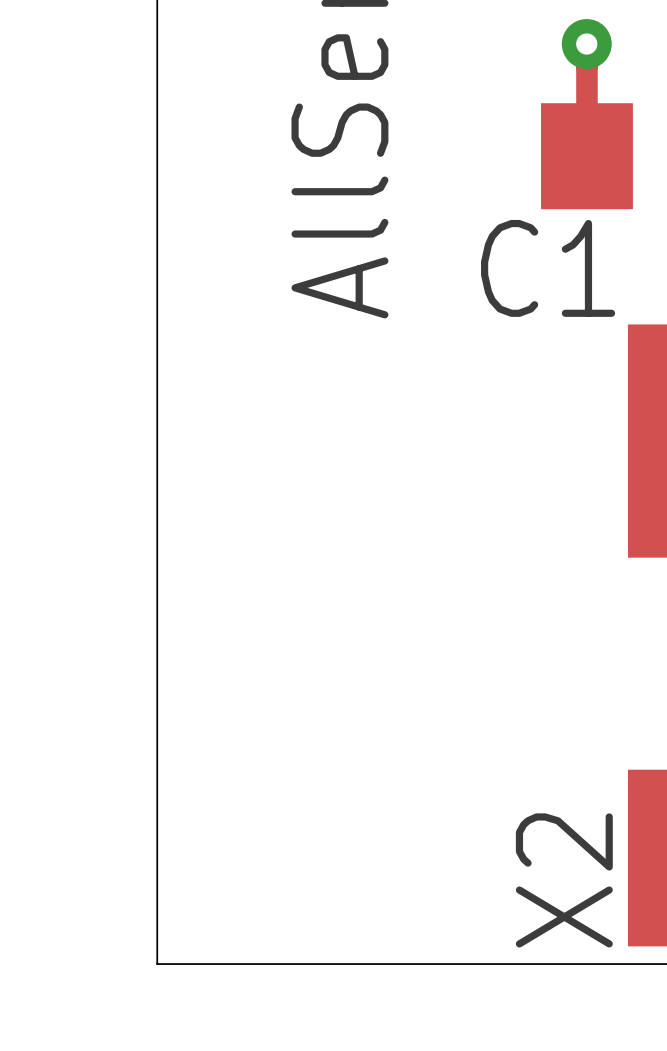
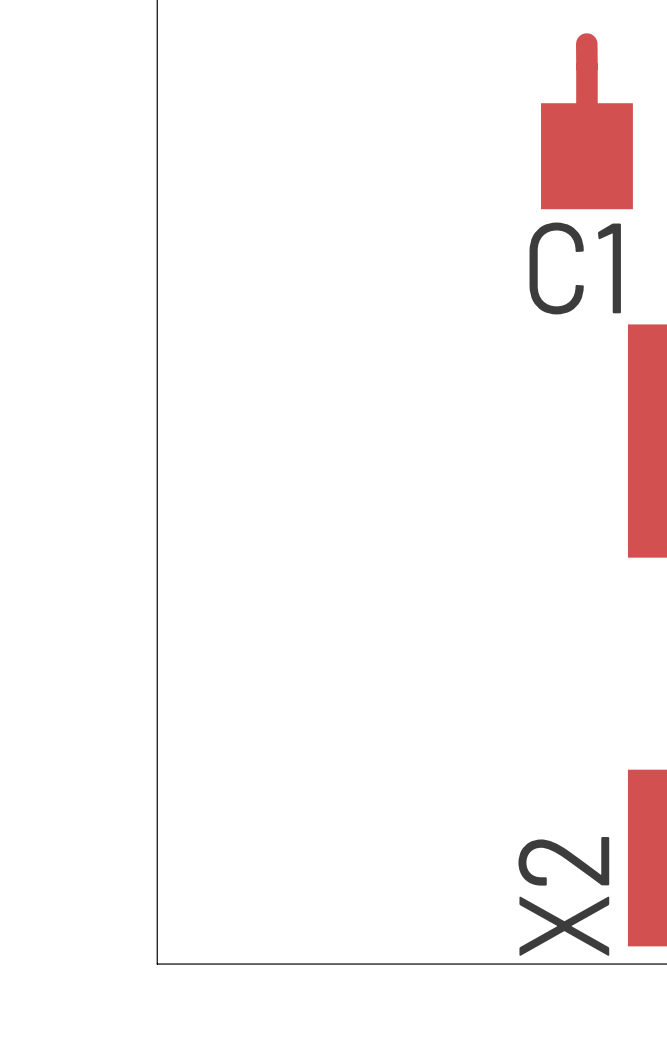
via: (586, 44) -> none

